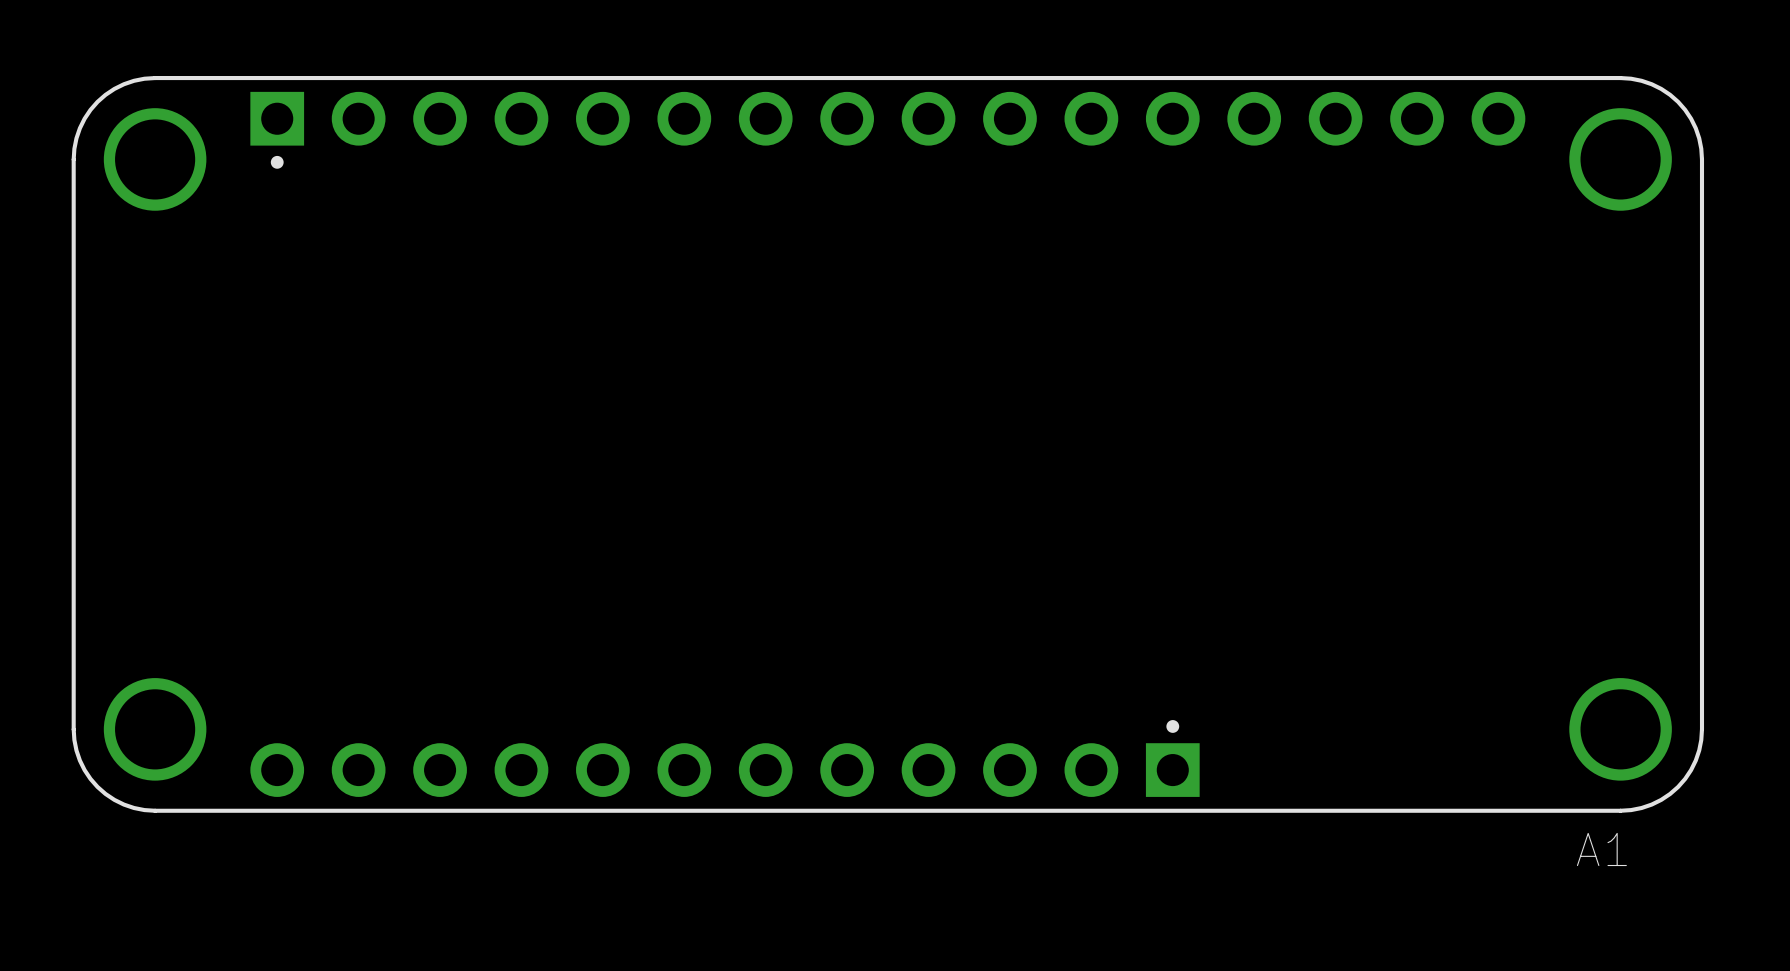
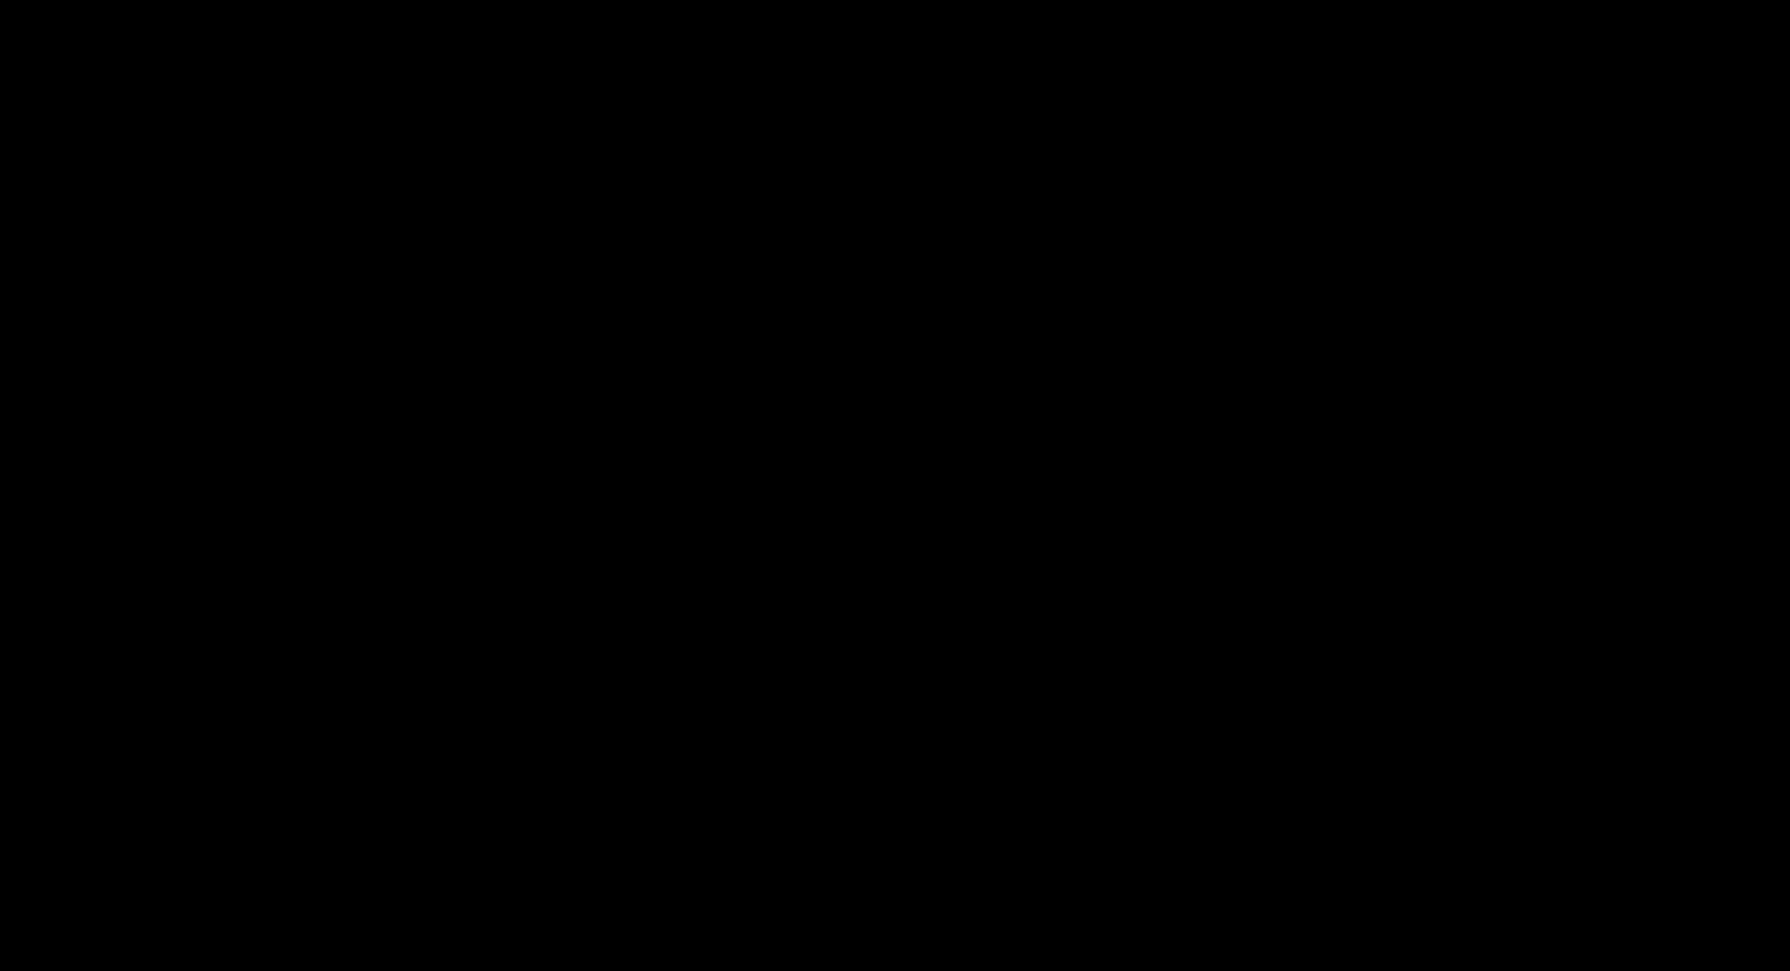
A1: (887, 444) -> none

